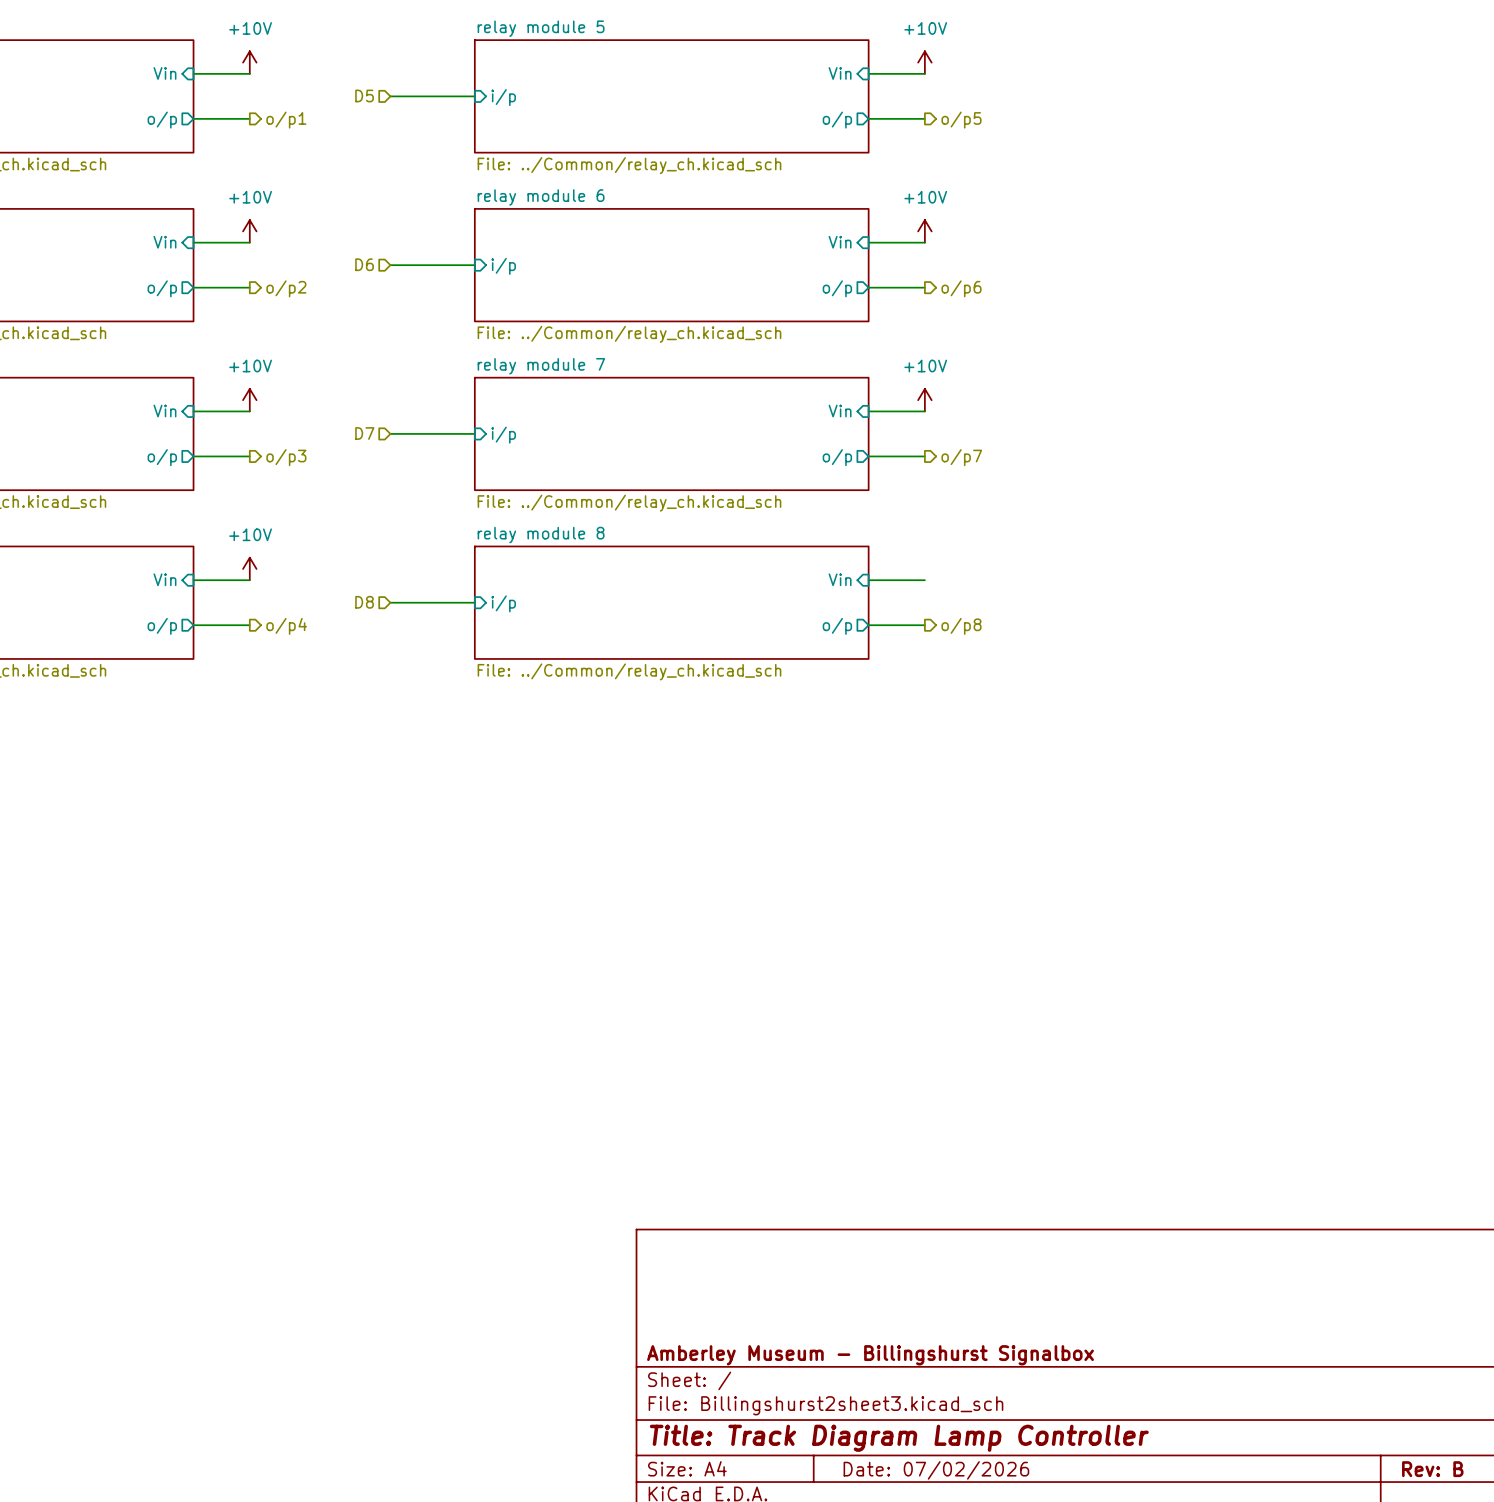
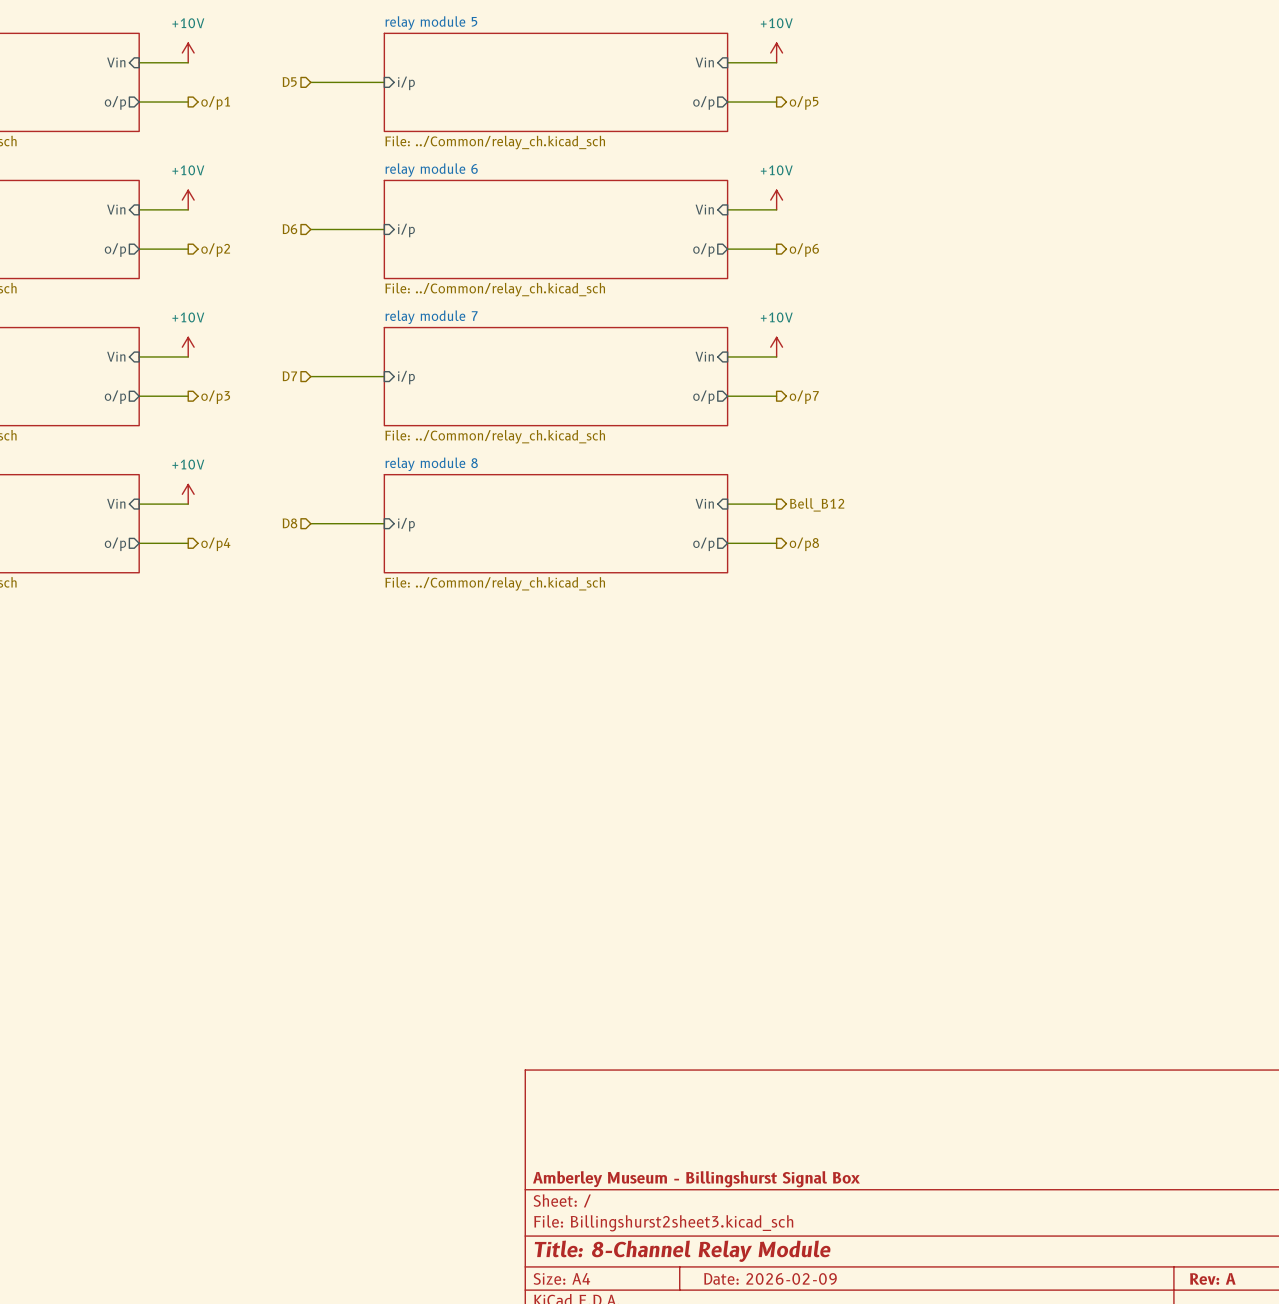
hierarchical label: none -> Bell_B12 (817, 504)
title block: Amberley Museum - Billingshurst Signalbox (870, 1355) -> Amberley Museum - Billingshurst Signal Box (696, 1179)
title block: Title: Track Diagram Lamp Controller (899, 1438) -> Title: 8-Channel Relay Module (682, 1251)
title block: Rev: B (1432, 1469) -> Rev: A (1212, 1278)
title block: Date: 07/02/2026 (936, 1470) -> Date: 2026-02-09 (770, 1278)

